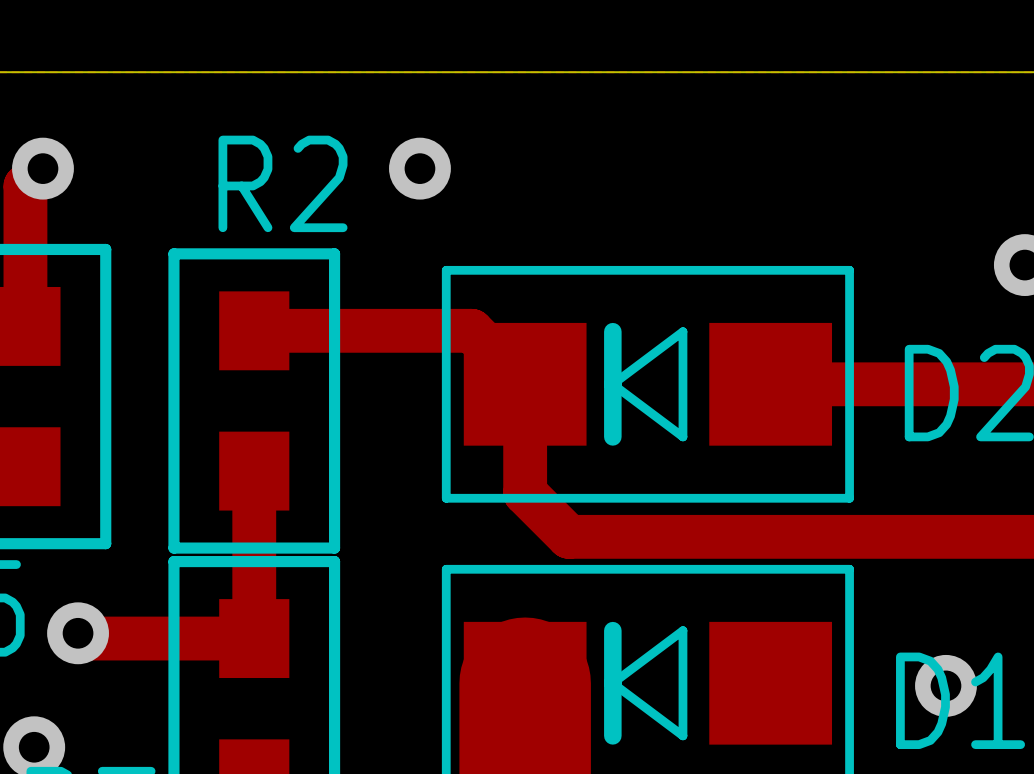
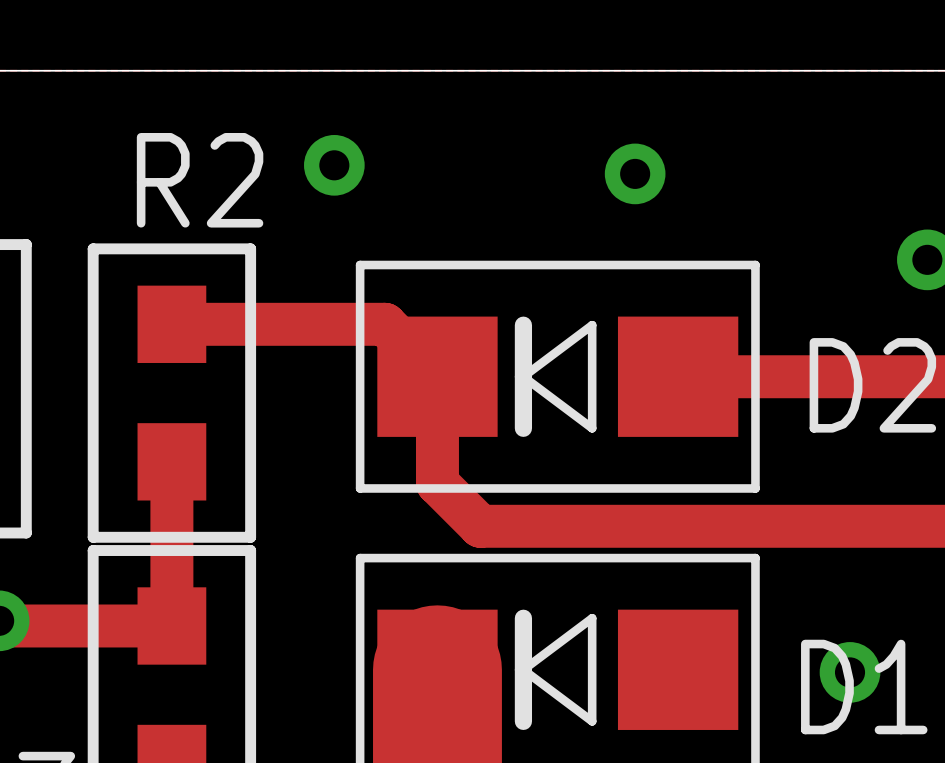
via: none -> (635, 173)

